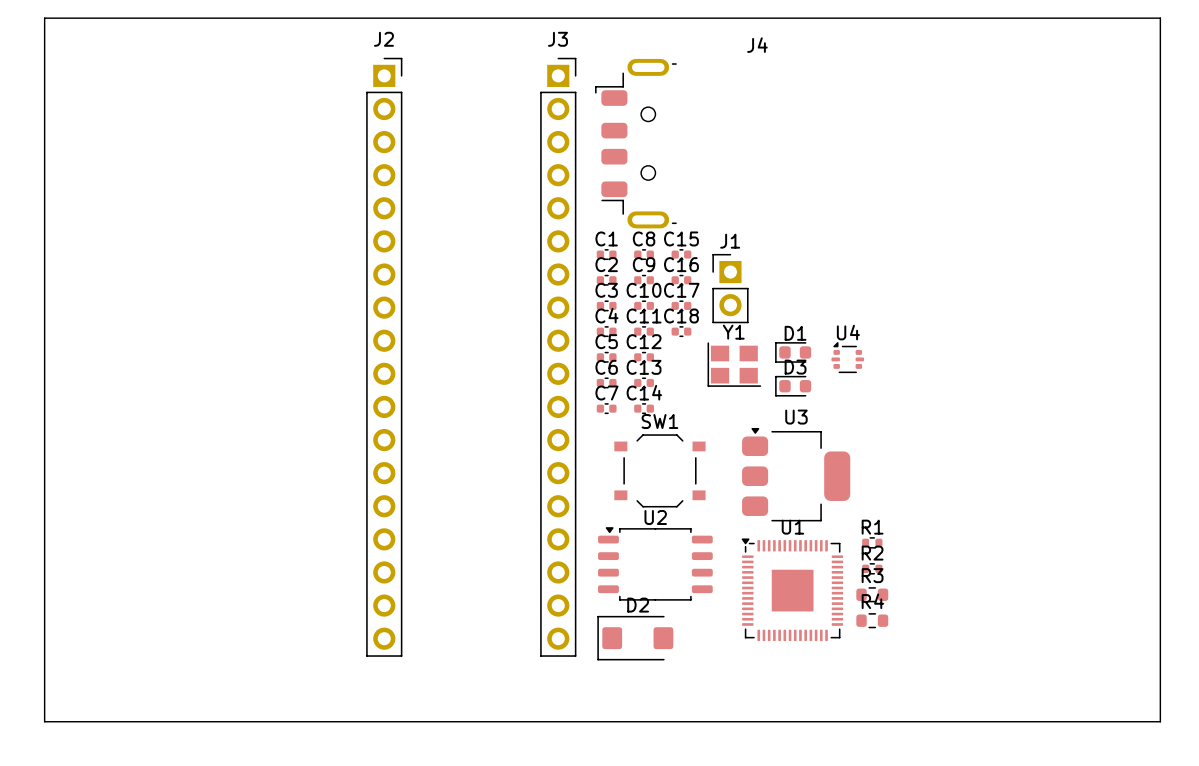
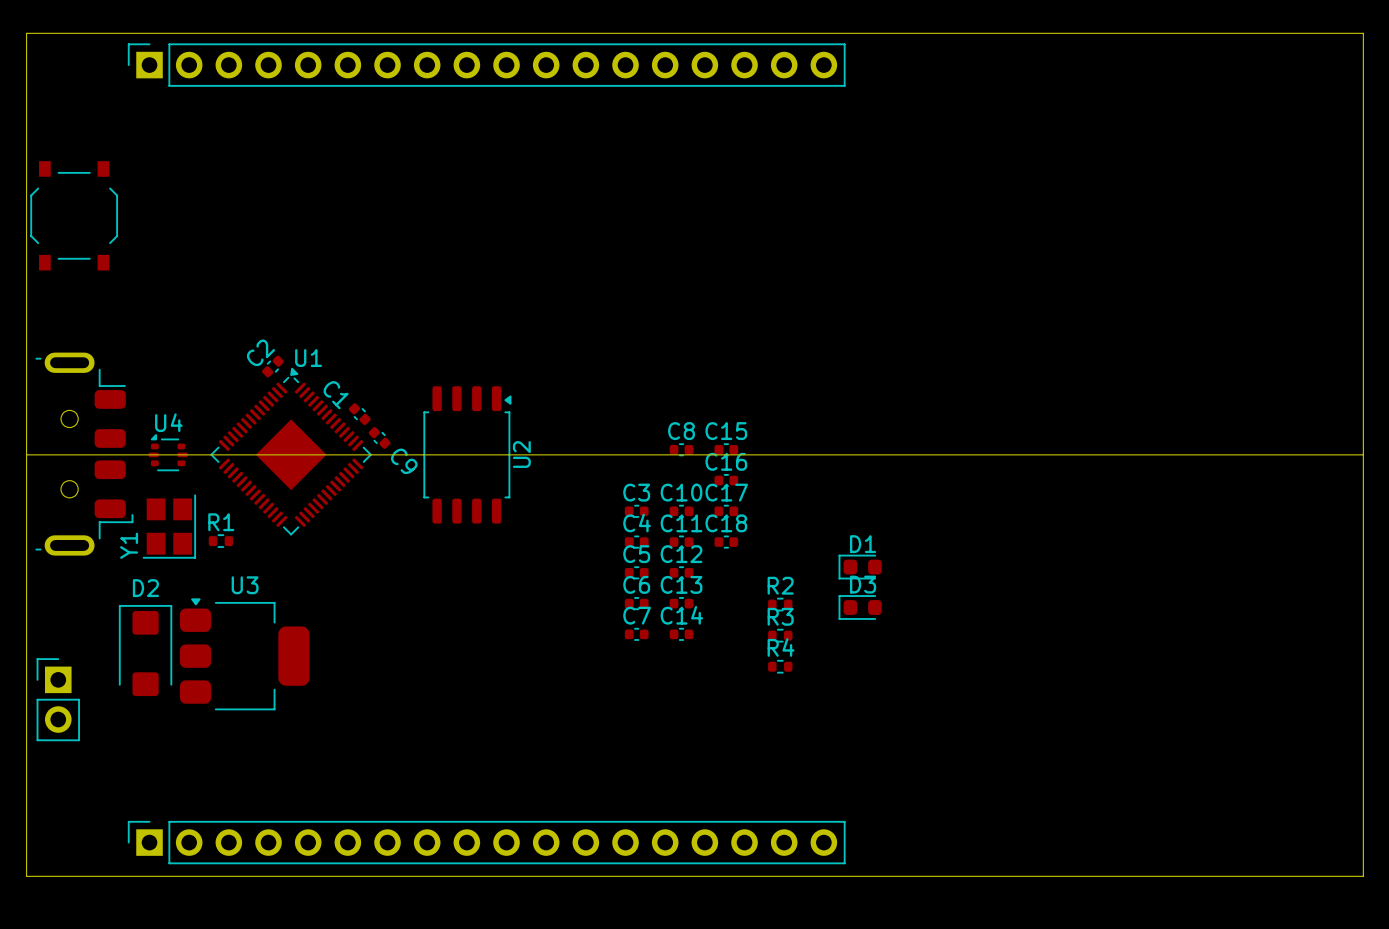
part: none -> (486, 65)
J4: (635, 143) -> none
part: none -> (74, 215)
C1 rotation: 0° (606, 254) -> 45° clockwise (359, 414)
C1 position: (606, 254) -> (359, 414)
C8 position: (644, 254) -> (681, 449)
C15 position: (681, 254) -> (726, 449)
C9 name position: C9 (644, 264) -> C9 (404, 461)
C2 rotation: 0° (606, 280) -> 45° counterclockwise (272, 366)
C2 position: (606, 280) -> (272, 366)
C9 rotation: 0° (644, 280) -> 45° clockwise (379, 437)
C9 position: (644, 280) -> (379, 437)
C16 position: (681, 280) -> (726, 480)
J1: (730, 288) -> none
C3 position: (606, 305) -> (636, 511)
C10 position: (644, 305) -> (681, 511)
C17 position: (681, 305) -> (726, 511)
C4 position: (606, 331) -> (636, 542)
C11 position: (644, 331) -> (681, 542)
C18 position: (681, 331) -> (726, 542)
D1 position: (793, 352) -> (860, 567)
J2: (384, 357) -> none
J3: (558, 357) -> none
C5 position: (606, 357) -> (636, 572)
C12 position: (644, 357) -> (681, 572)
U4 position: (847, 357) -> (168, 452)
Y1 rotation: 0° (734, 364) -> 90° counterclockwise (169, 526)
Y1 position: (734, 364) -> (169, 526)
board edge: none -> (26, 454) (1363, 454)
part: none -> (84, 454)
C6 position: (606, 382) -> (636, 603)
C13 position: (644, 382) -> (681, 603)
D3 position: (793, 386) -> (860, 607)
C7 position: (606, 408) -> (636, 634)
C14 position: (644, 408) -> (681, 634)
SW1: (659, 470) -> none
U3 position: (796, 474) -> (244, 654)
R1 position: (872, 542) -> (220, 541)
U2 rotation: 0° (655, 563) -> 90° clockwise (467, 454)
U2 position: (655, 563) -> (467, 454)
R2 position: (872, 568) -> (780, 604)
part: none -> (58, 699)
R3 footprint: [856, 587, 889, 603] -> [768, 628, 793, 643]
U1 rotation: 0° (792, 589) -> 45° clockwise (291, 451)
U1 position: (792, 589) -> (291, 451)
R4 footprint: [856, 613, 889, 629] -> [768, 659, 793, 674]
D2 rotation: 0° (635, 638) -> 90° clockwise (145, 650)
D2 position: (635, 638) -> (145, 650)
part: none -> (486, 842)

